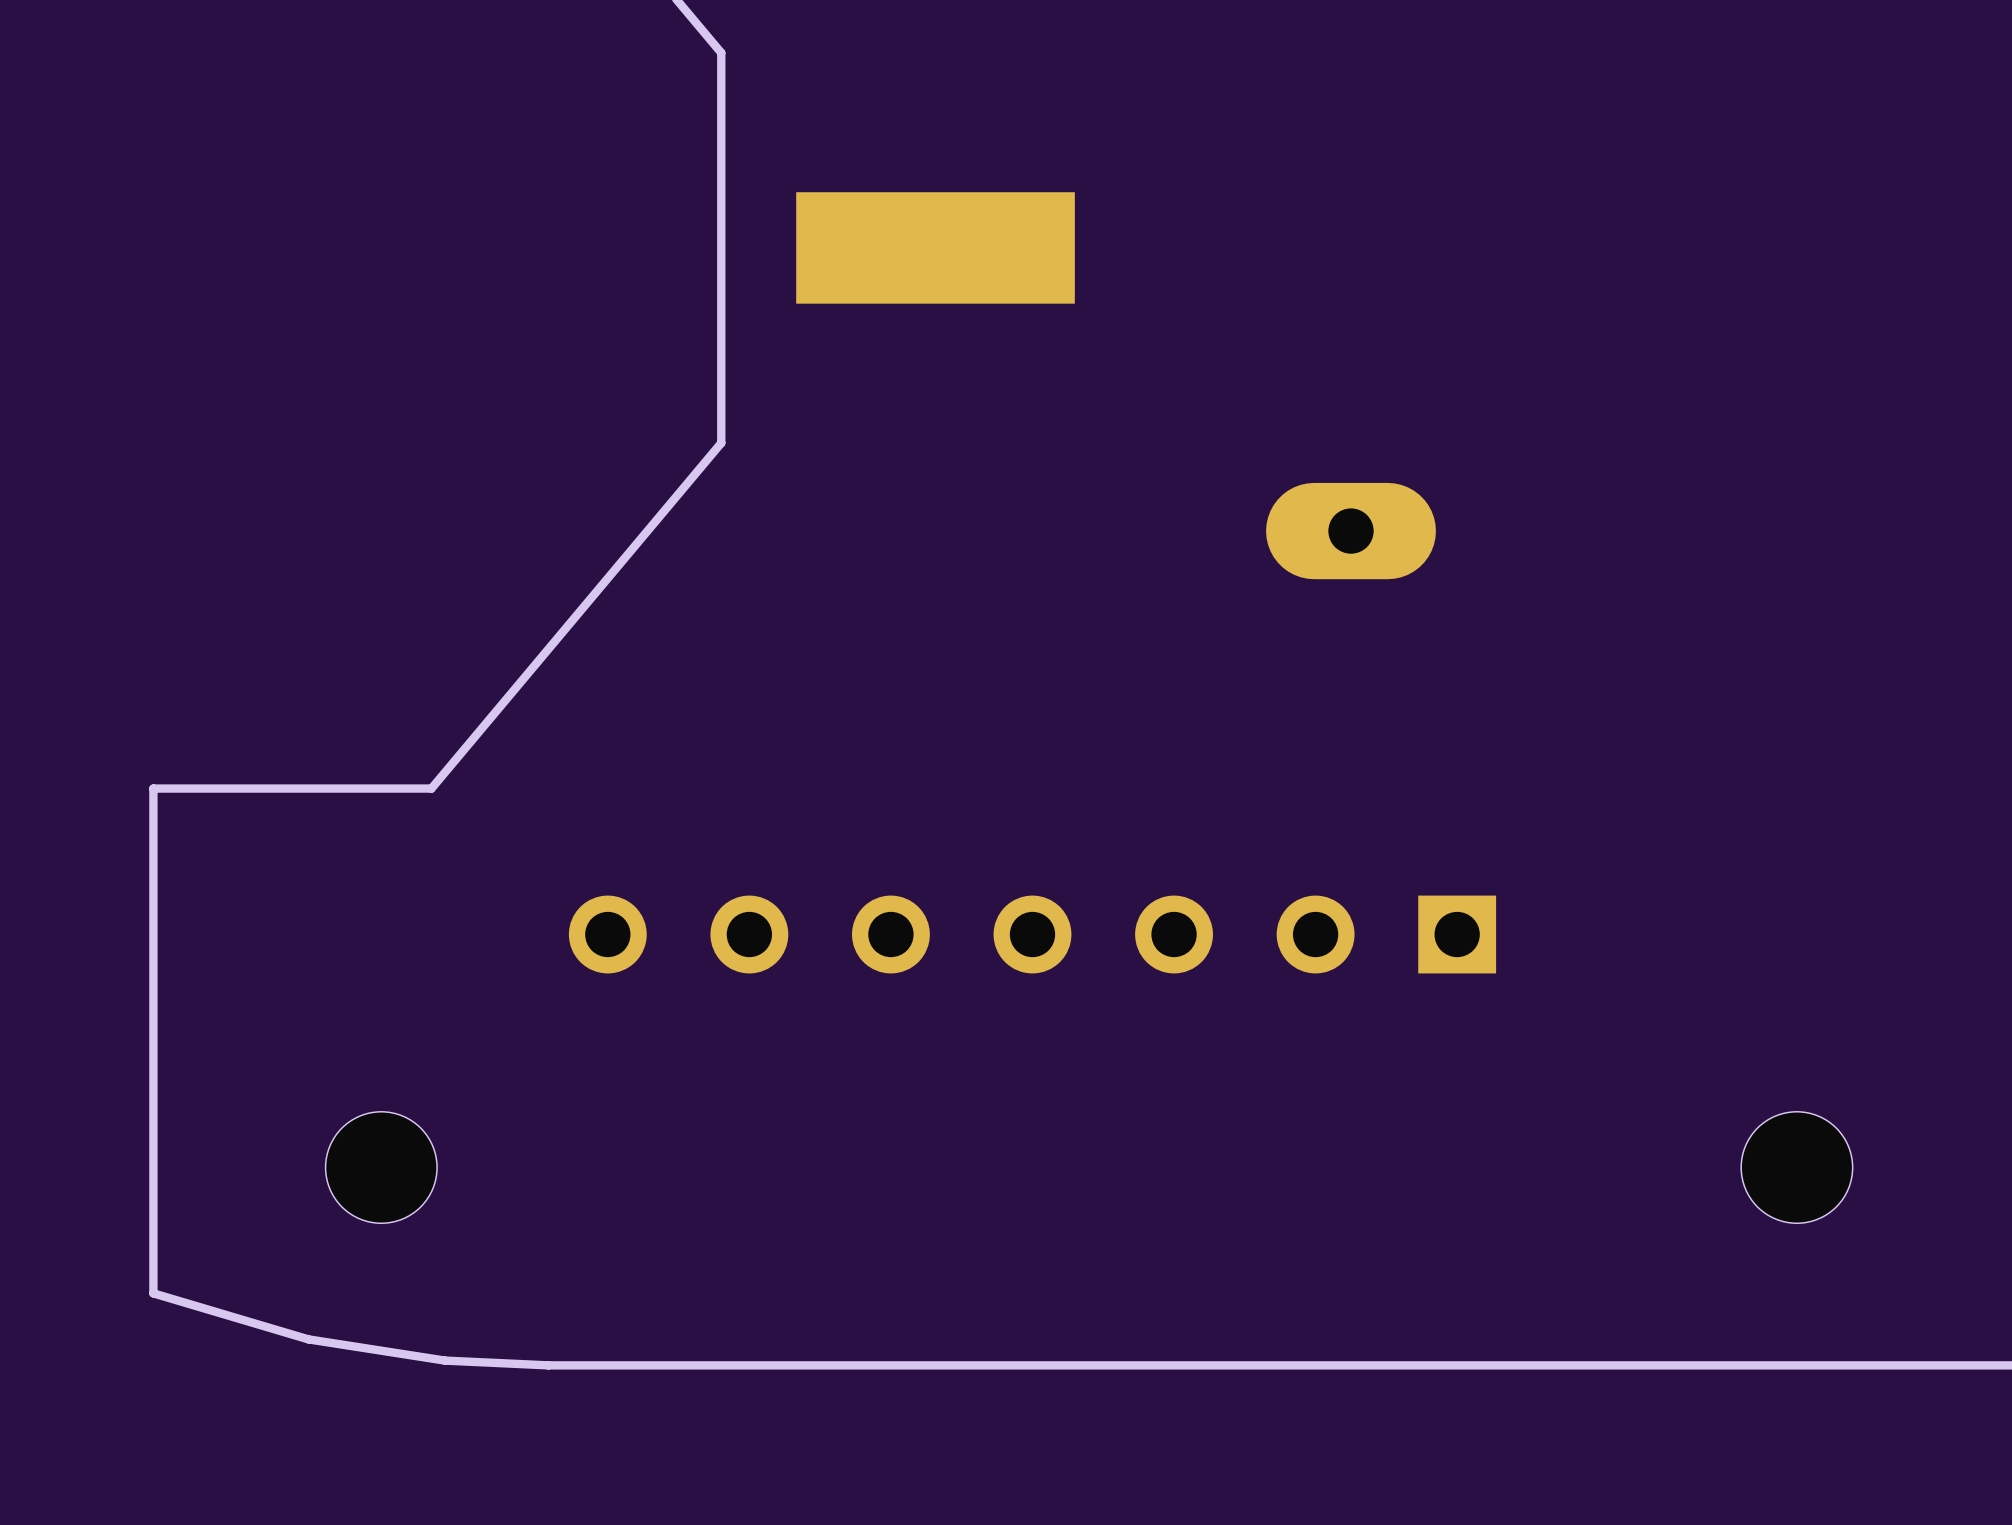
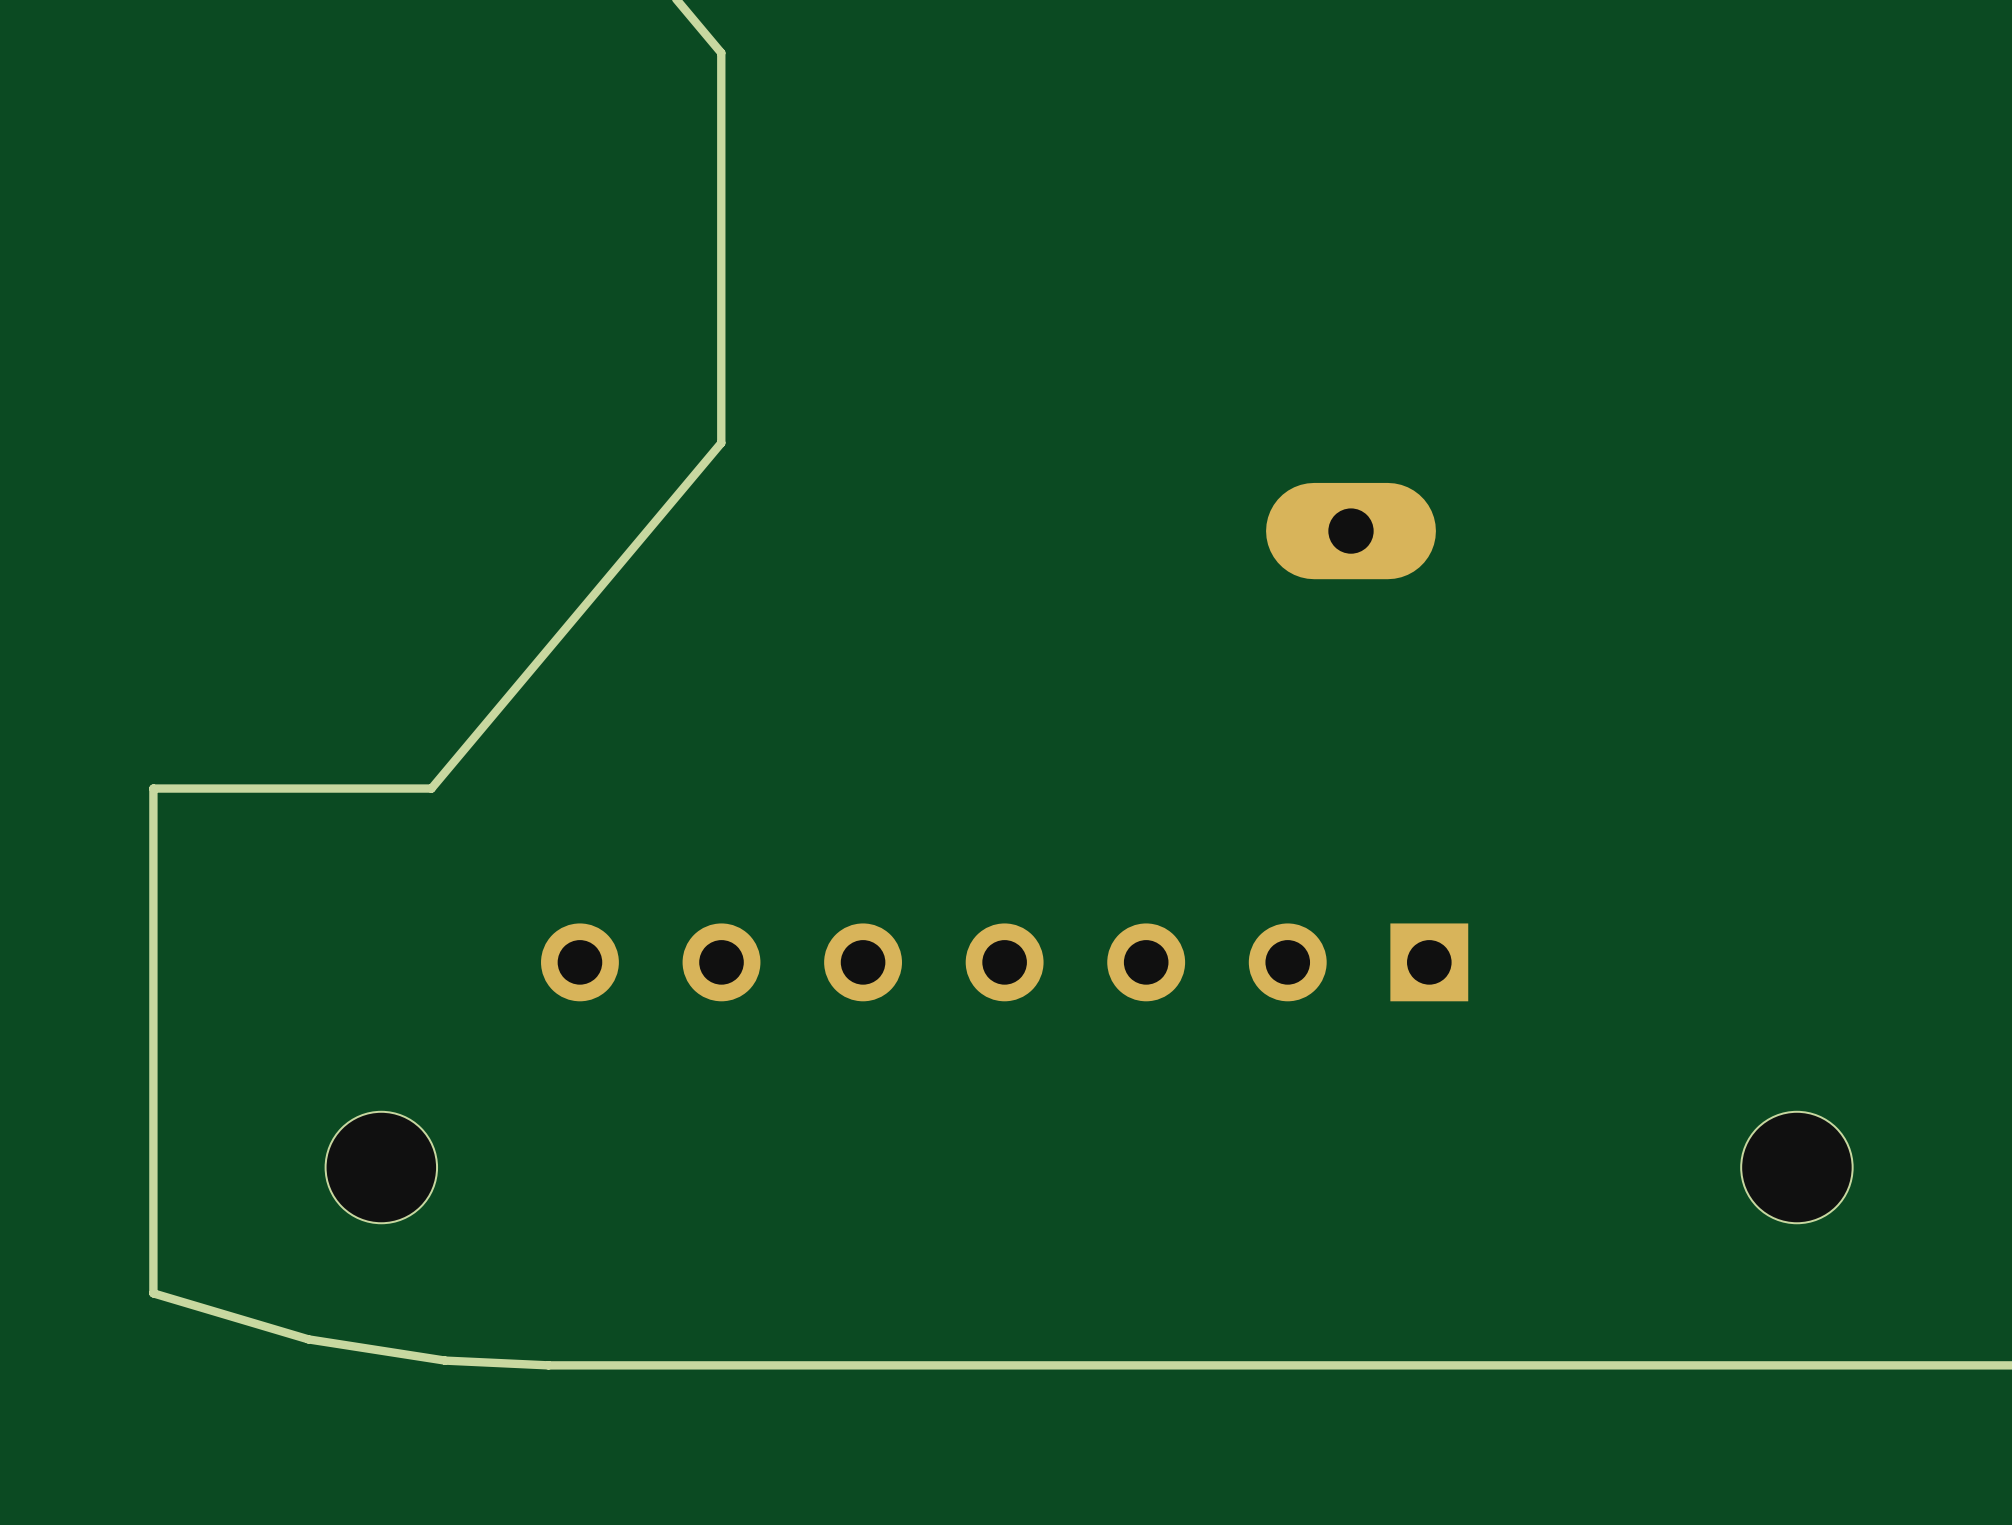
part: (935, 247) -> none
part footprint: [568, 895, 1497, 974] -> [541, 923, 1469, 1002]

